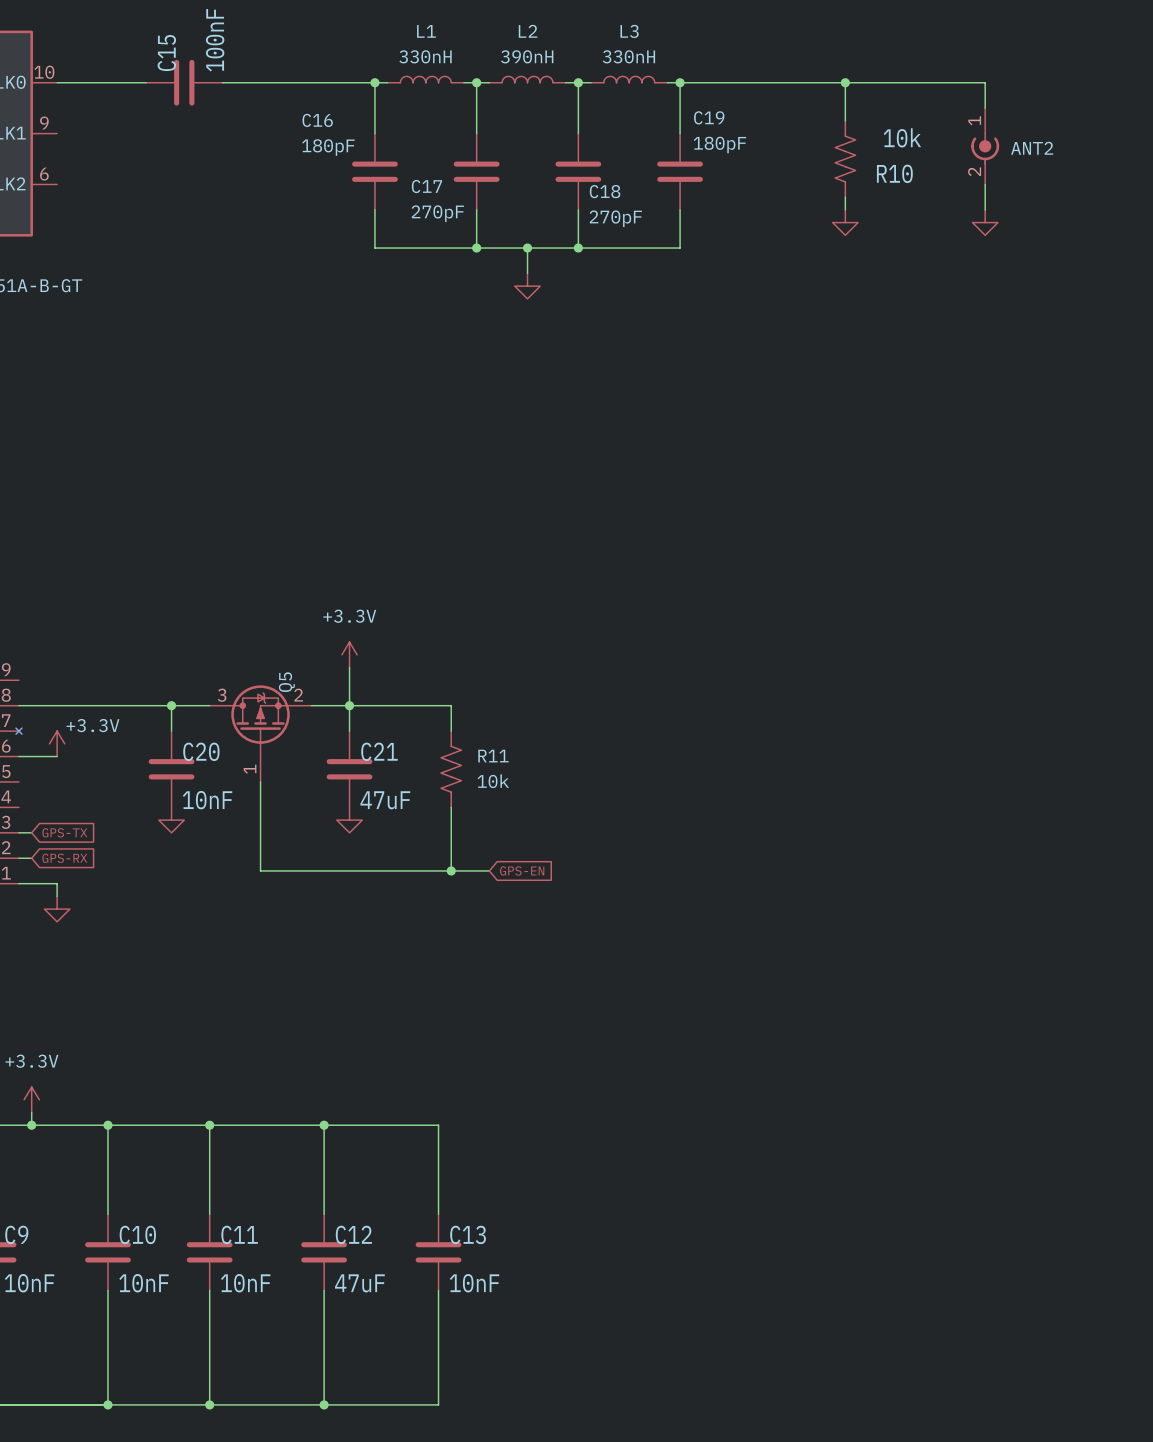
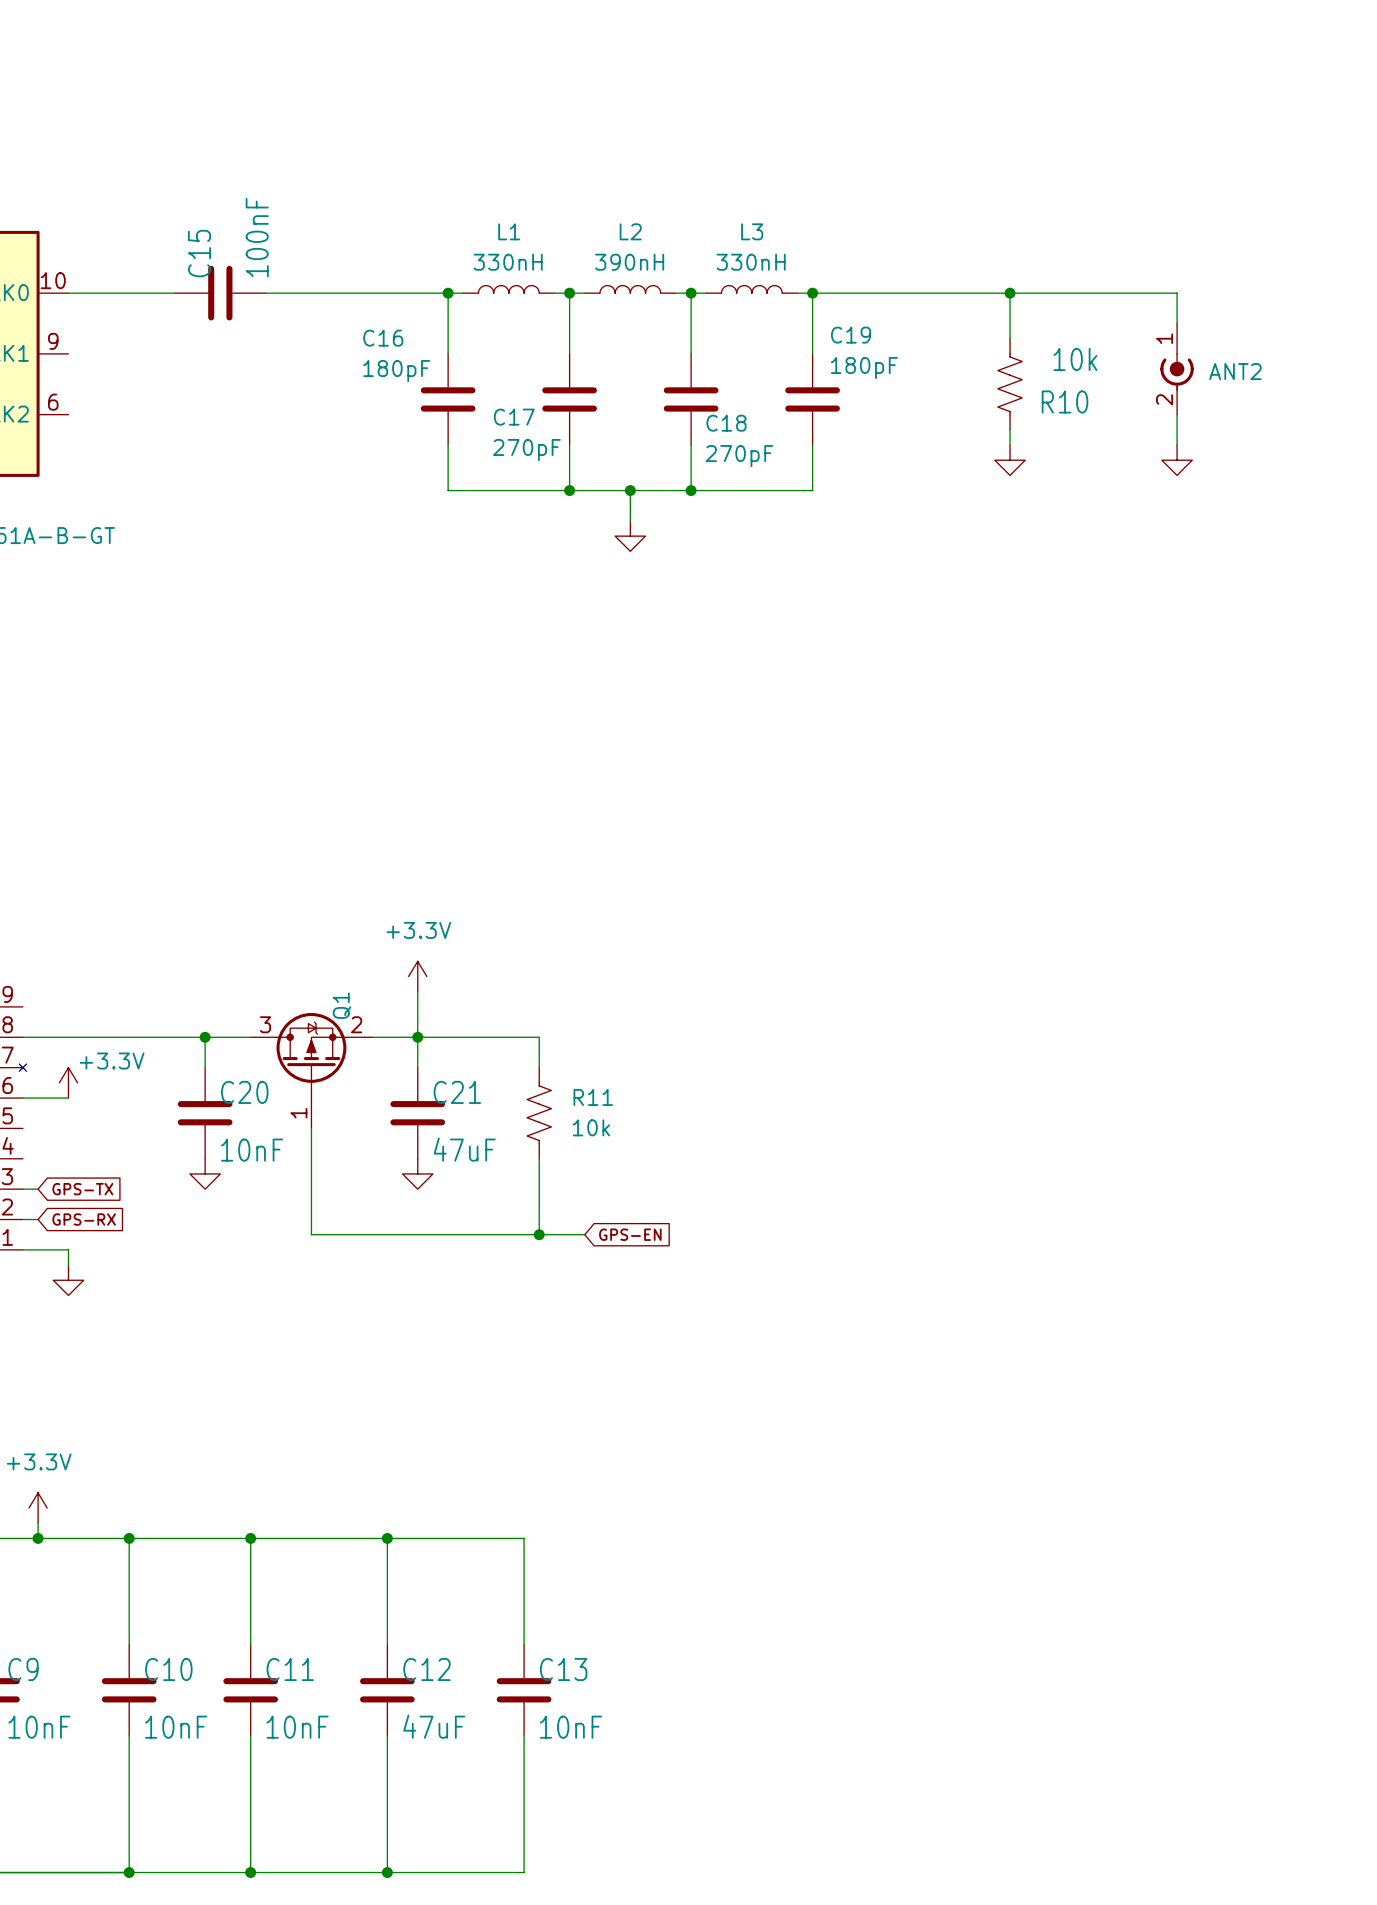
Q5 name: Q5 (286, 682) -> Q1 (341, 1005)

